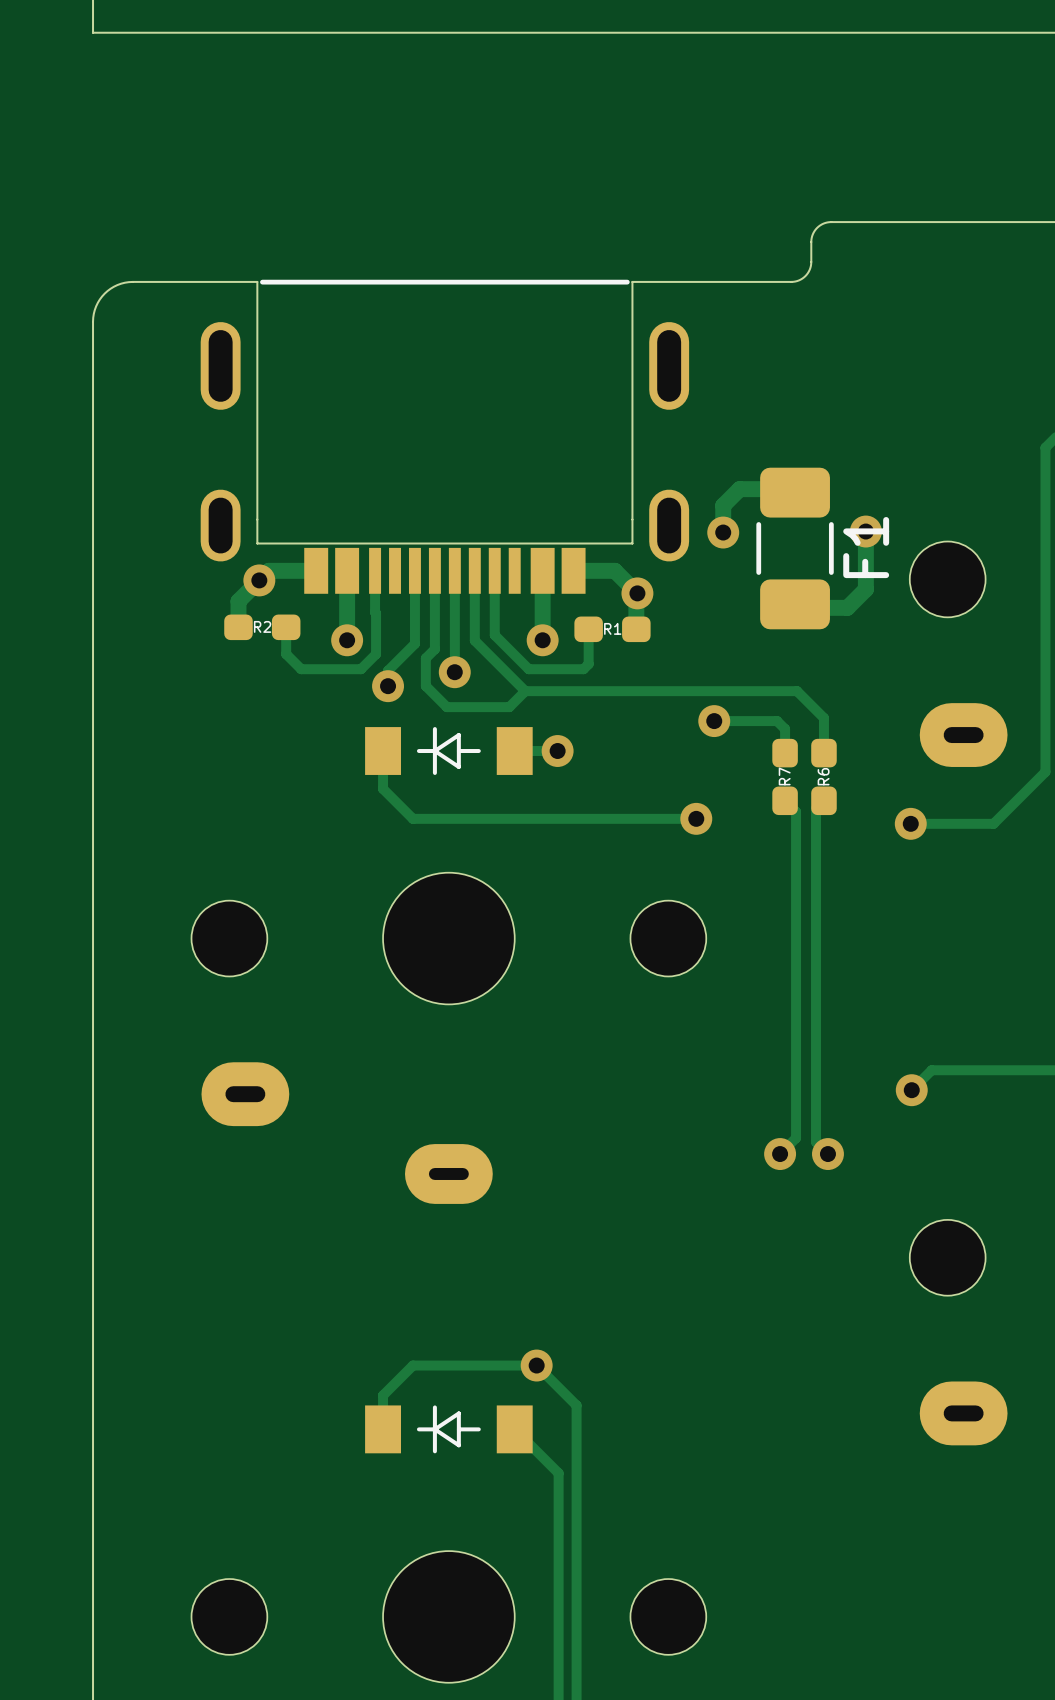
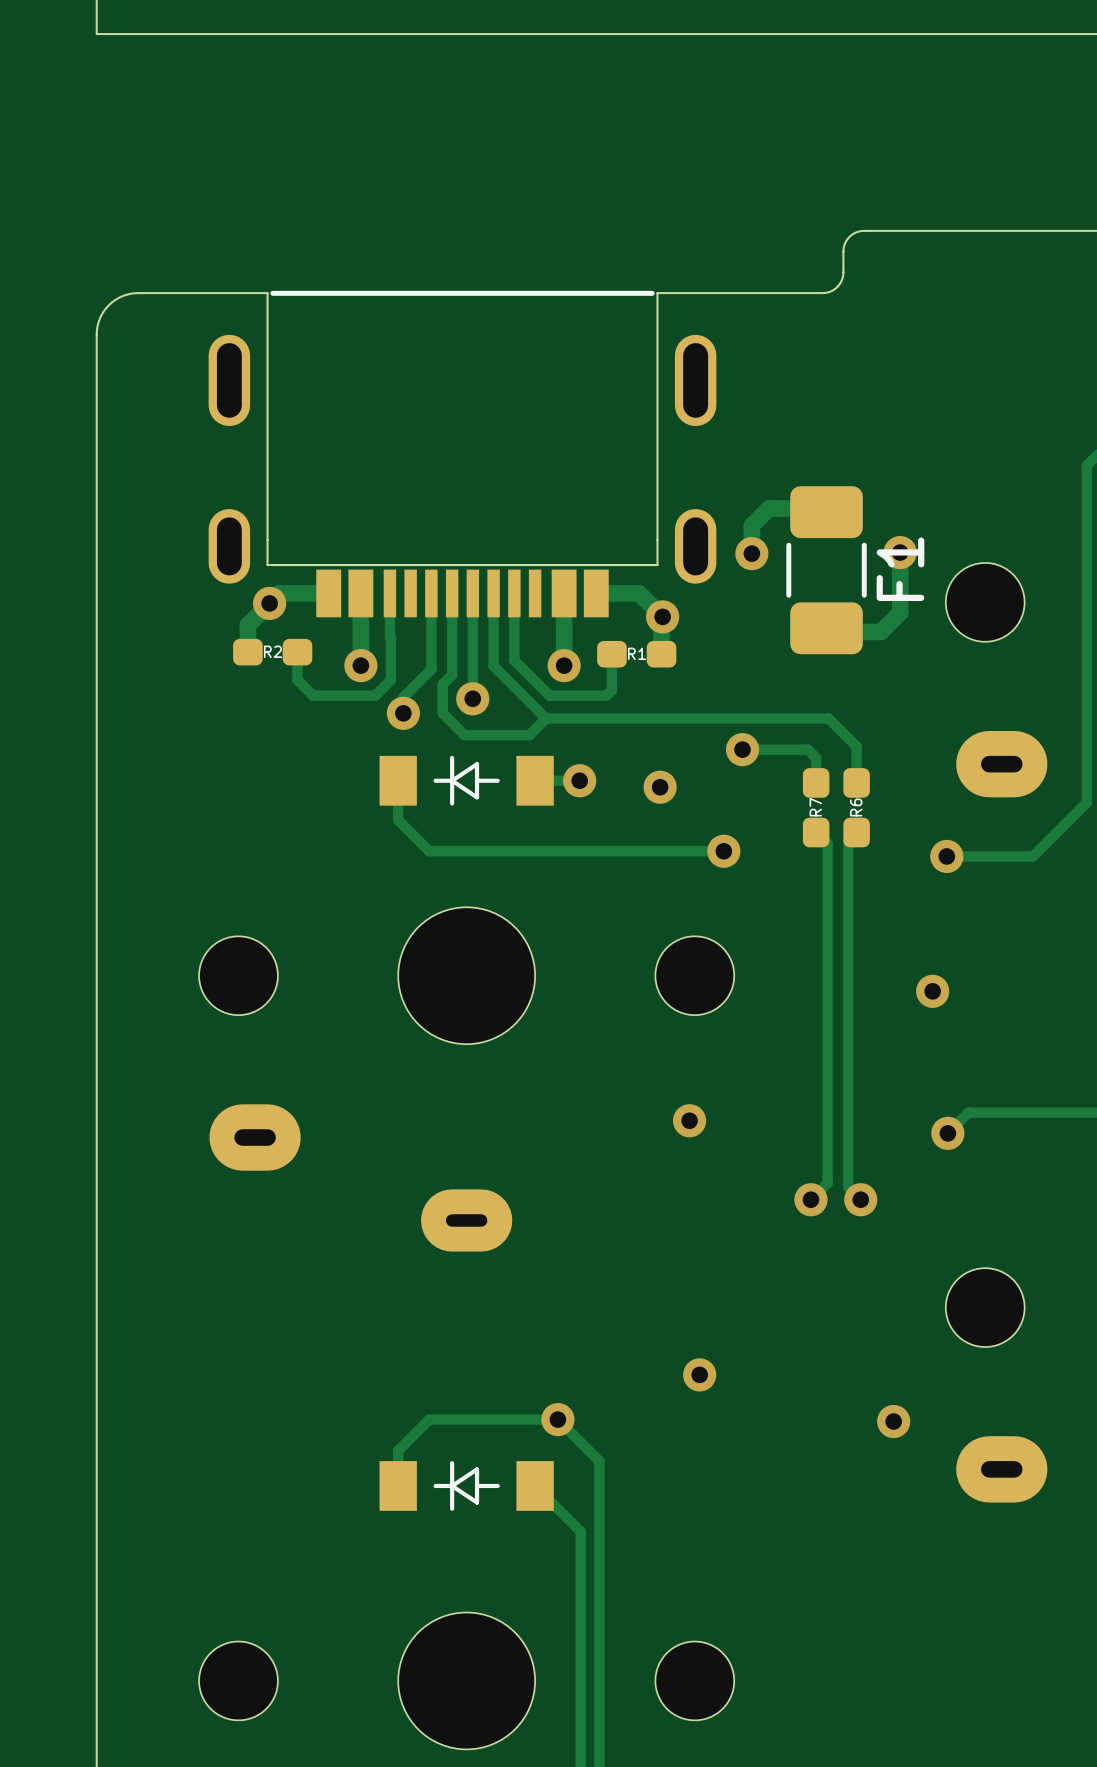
via: none -> (660, 787)
via: none -> (932, 991)
via: none -> (689, 1120)
via: none -> (699, 1374)
via: none -> (893, 1421)

